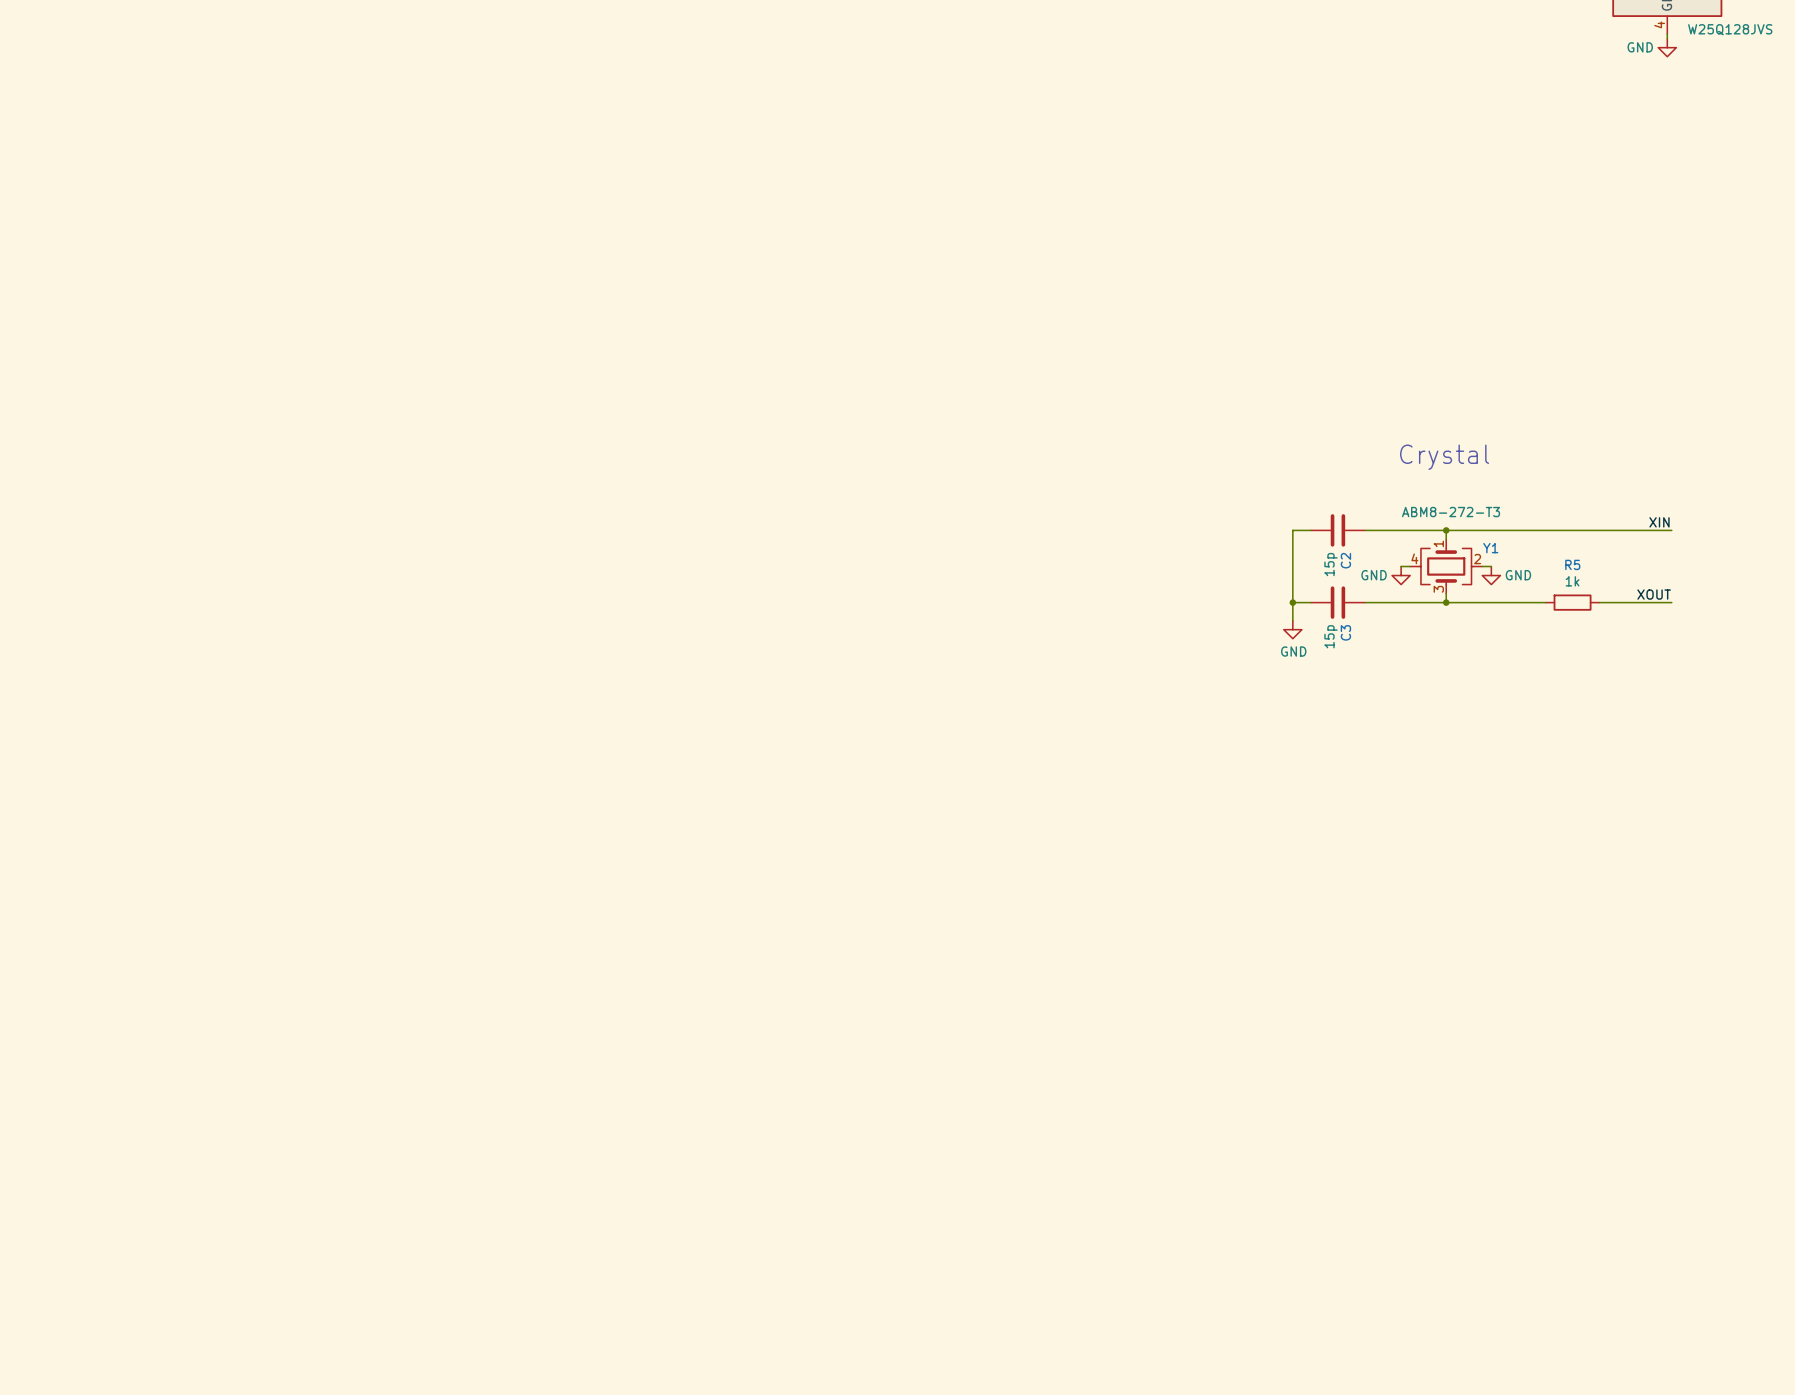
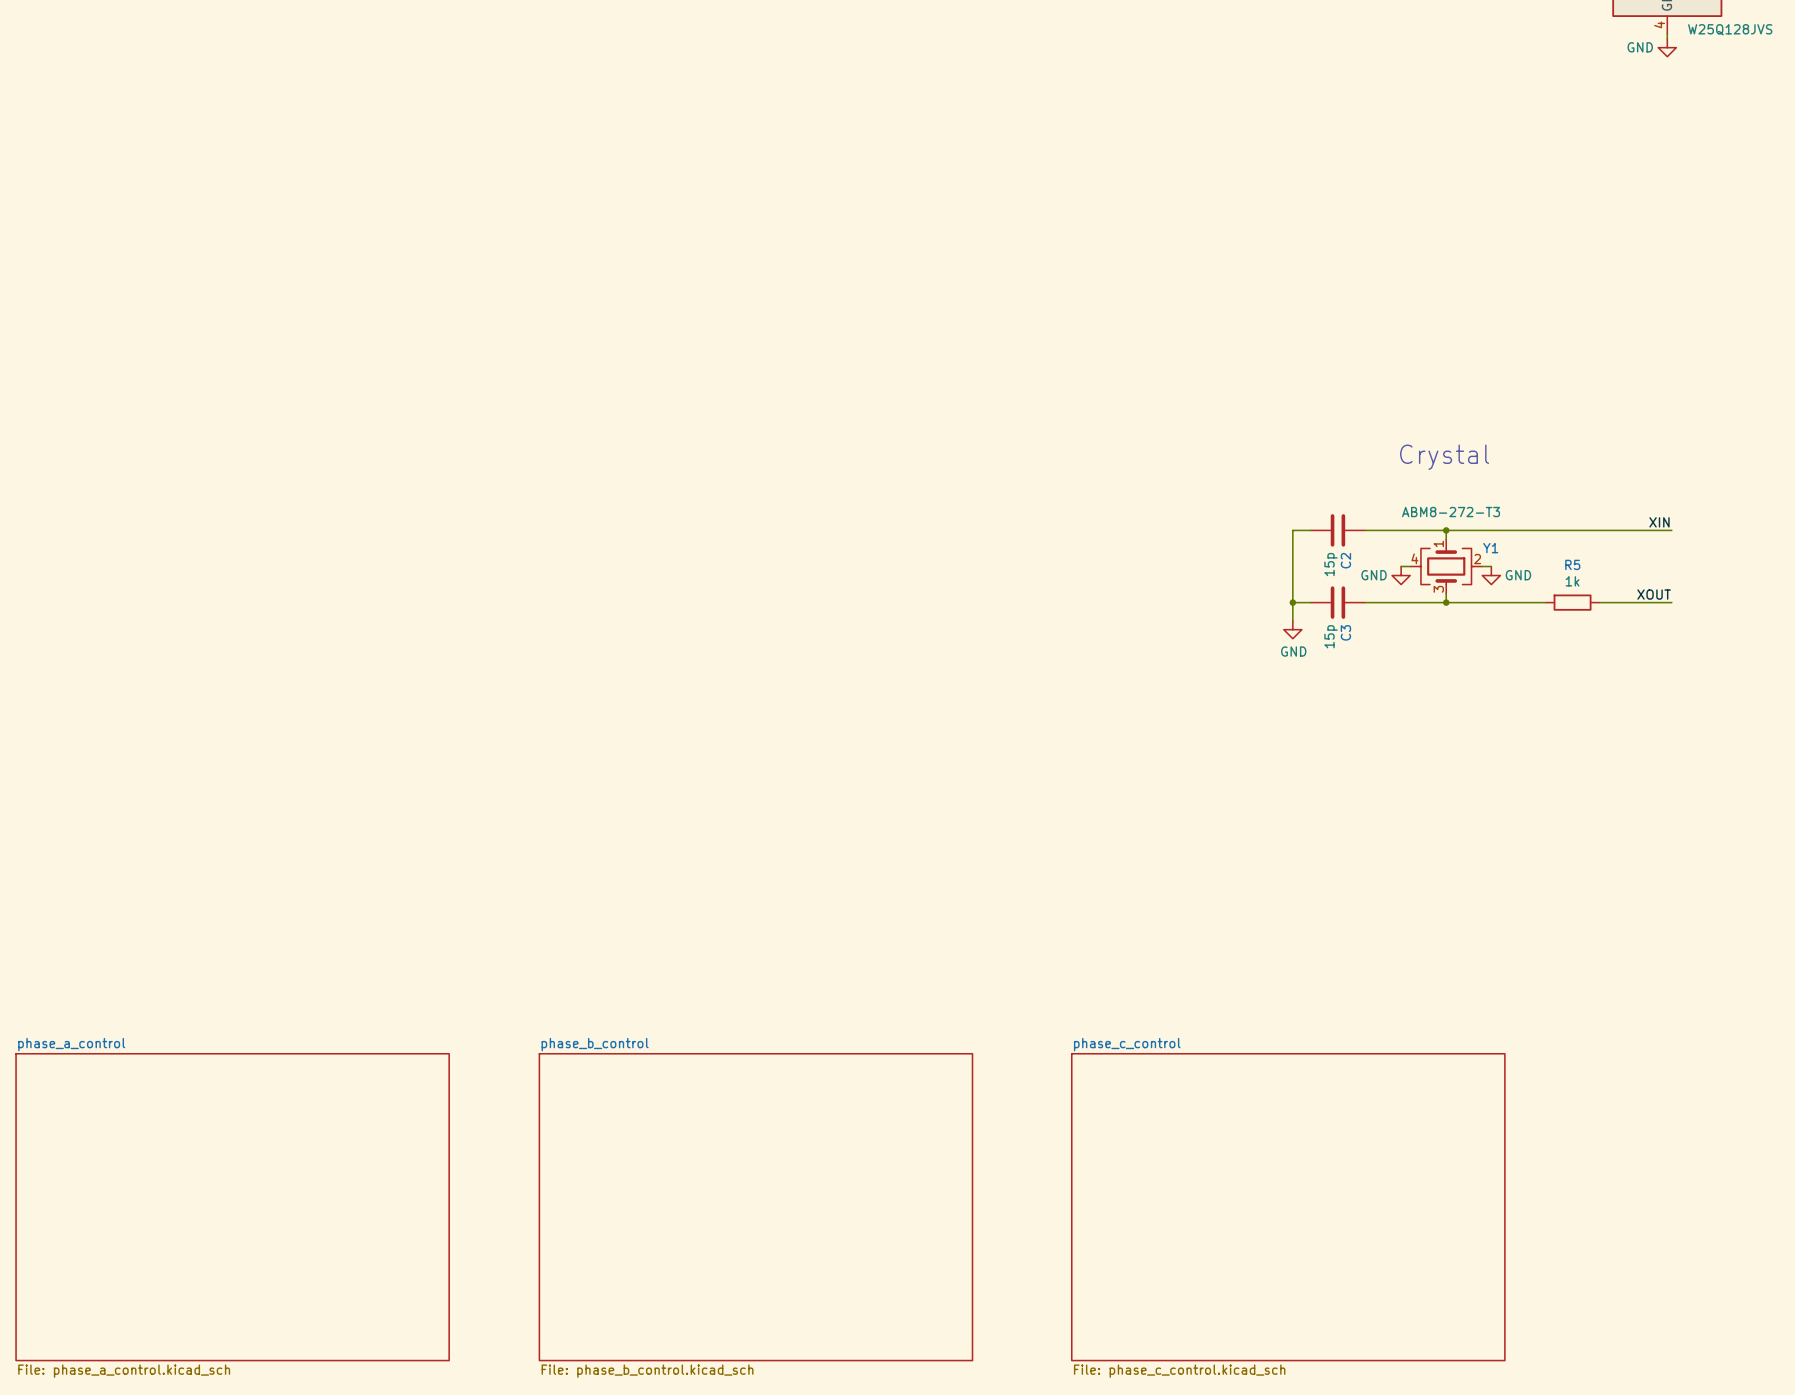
sheet phase_a_control: none -> File: phase_a_control.kicad_sch (232, 1207)
sheet phase_b_control: none -> File: phase_b_control.kicad_sch (755, 1207)
sheet phase_c_control: none -> File: phase_c_control.kicad_sch (1288, 1207)

